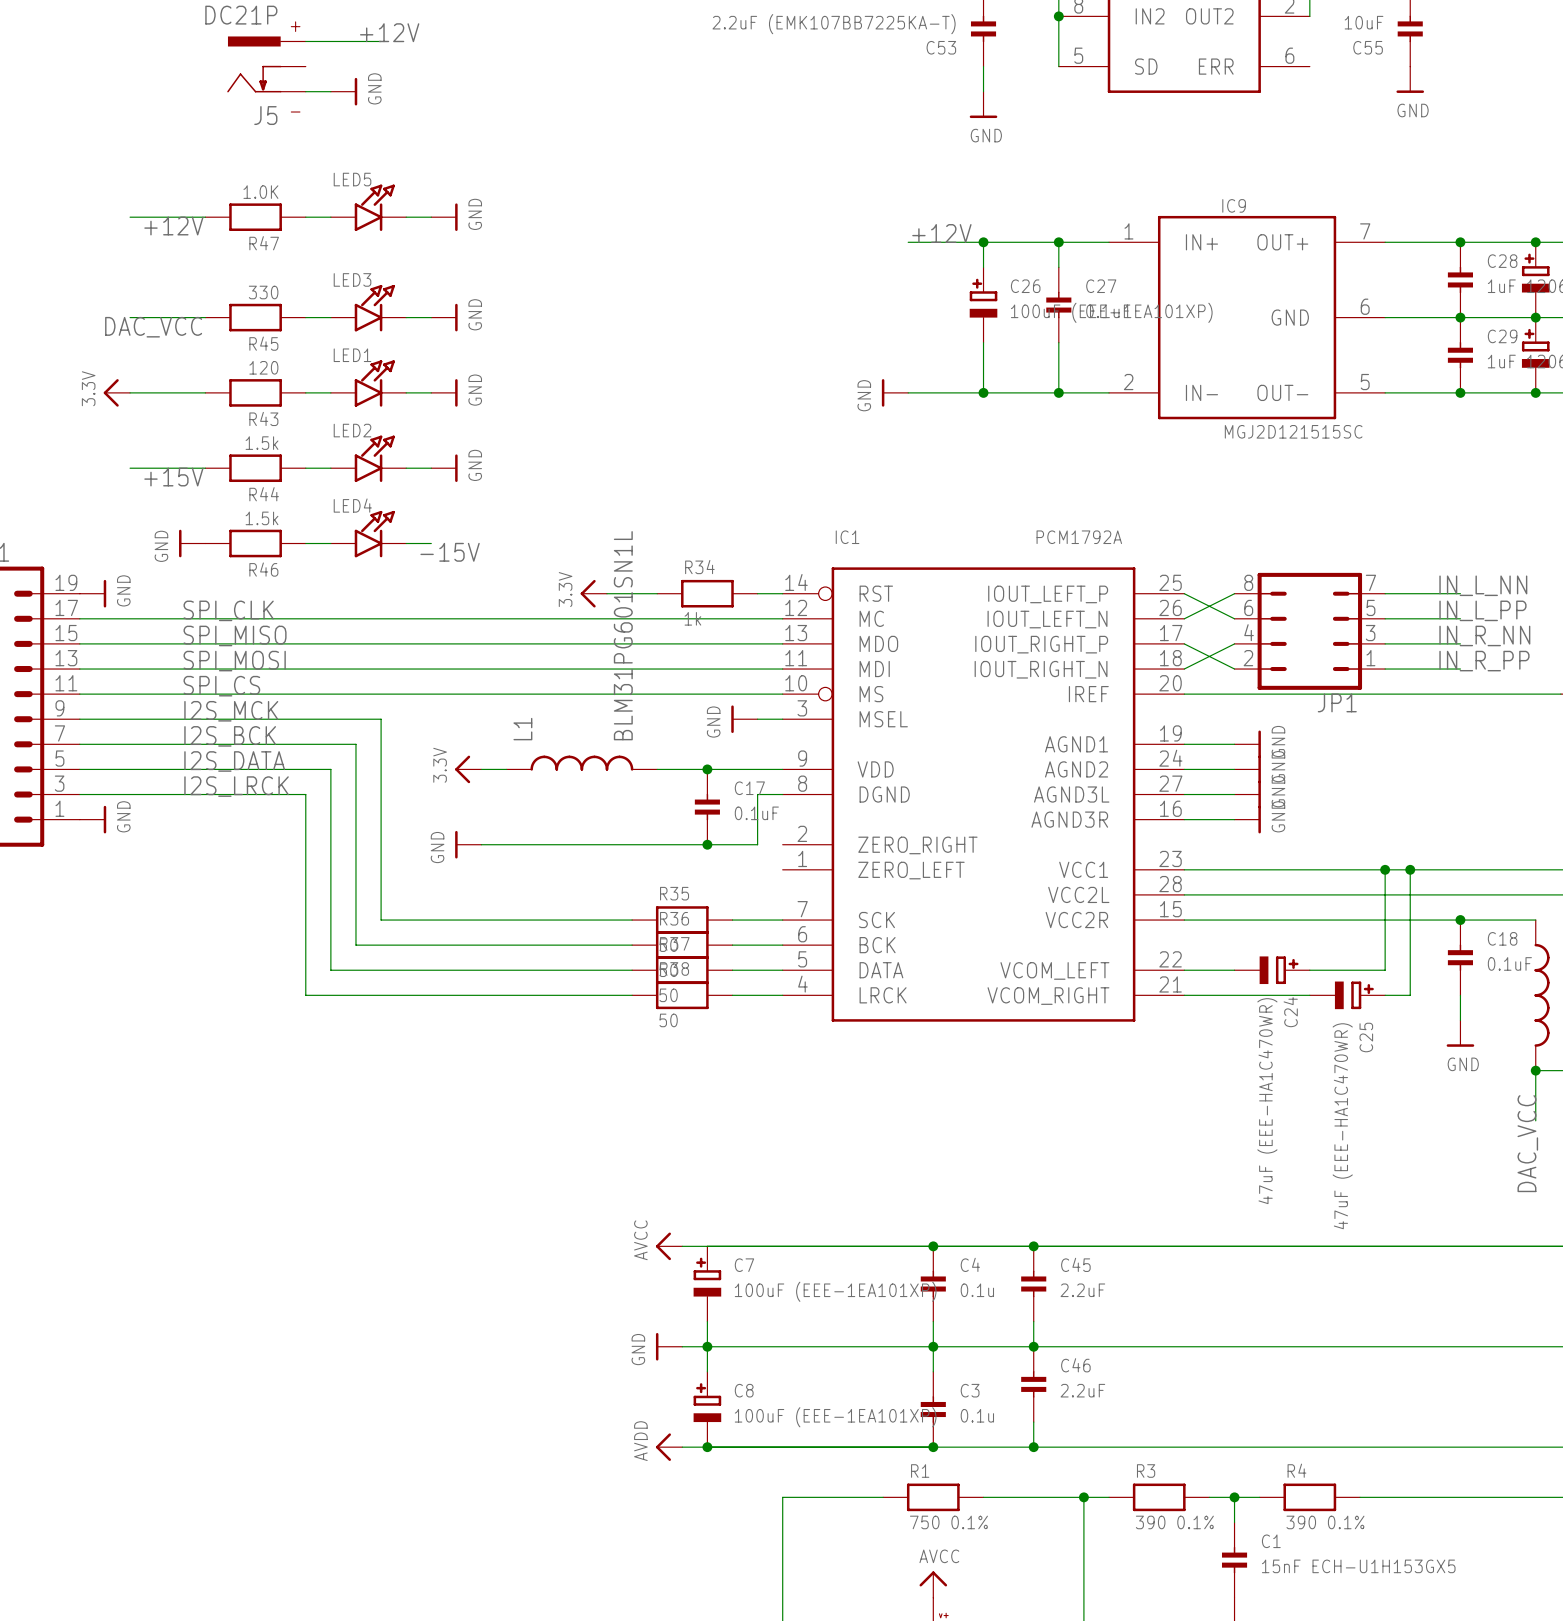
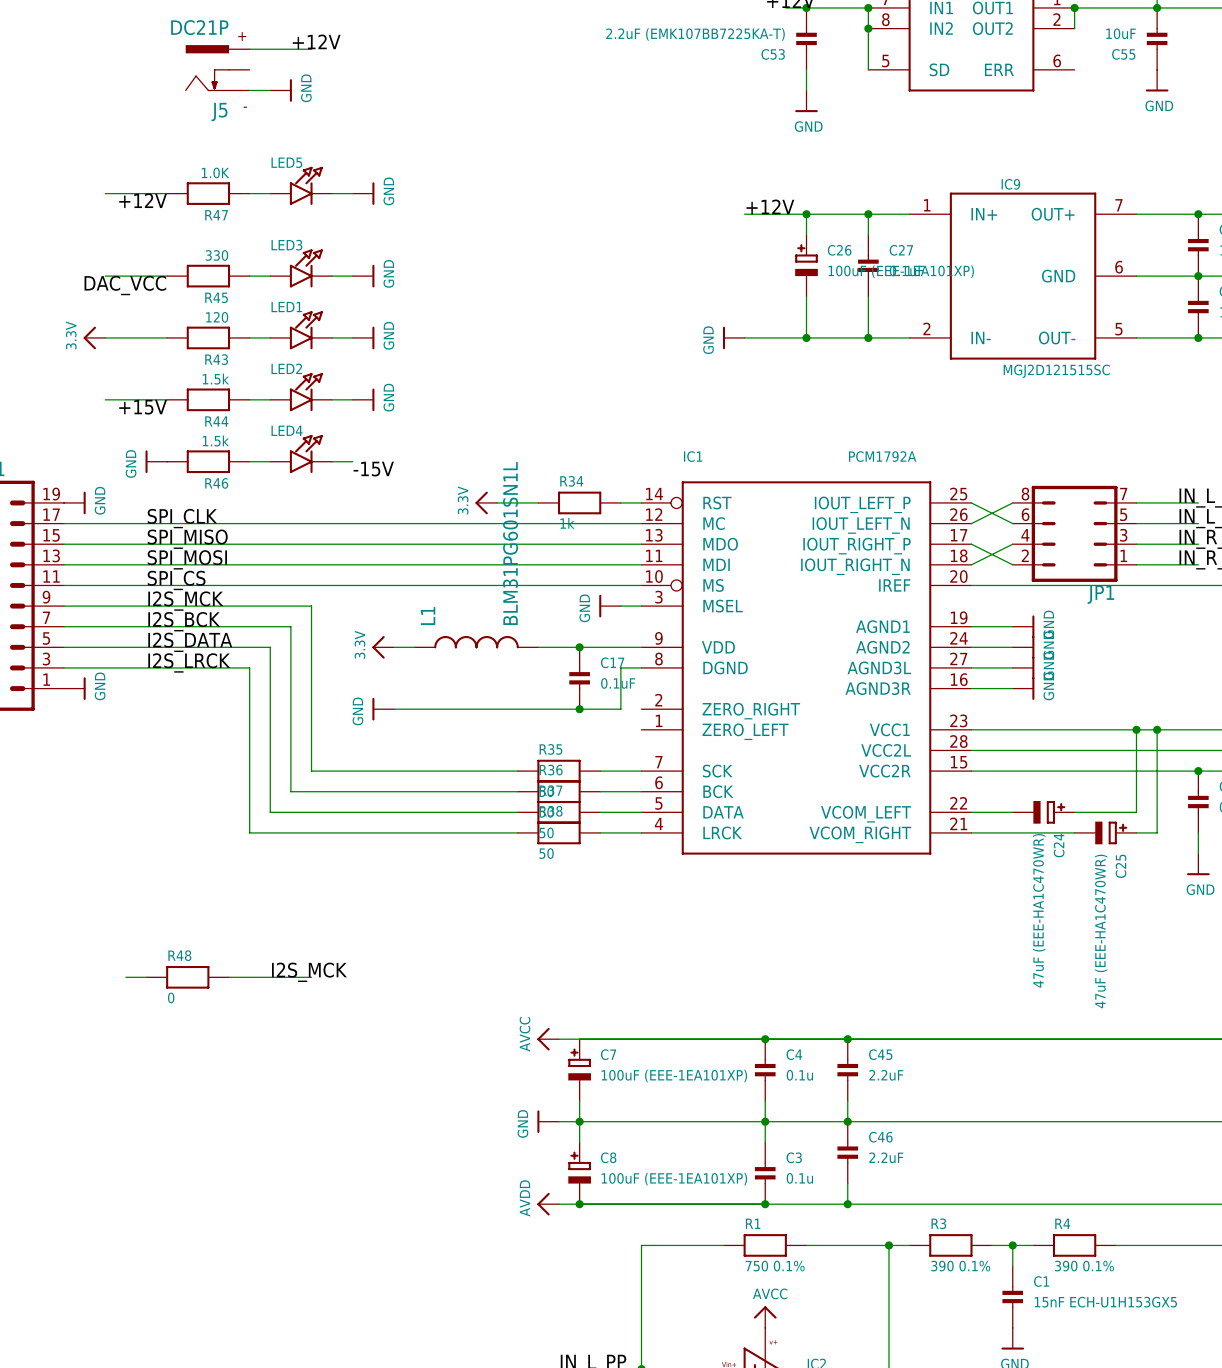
label: none -> I2S_MCK (309, 972)
wire: none -> (125, 977) (146, 977)
R48: none -> 0 (187, 977)
wire: none -> (229, 977) (311, 977)

